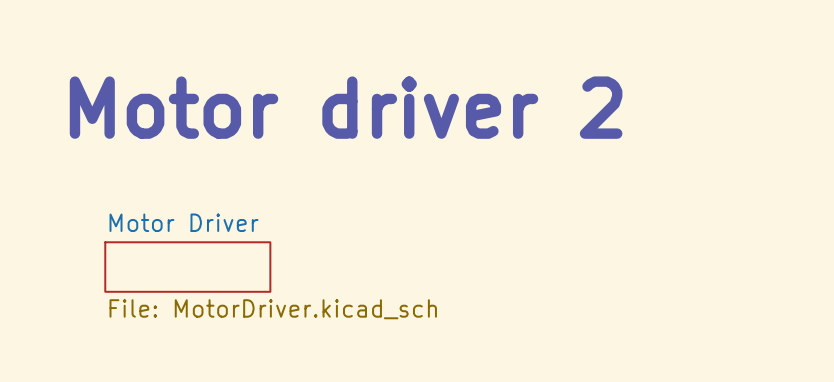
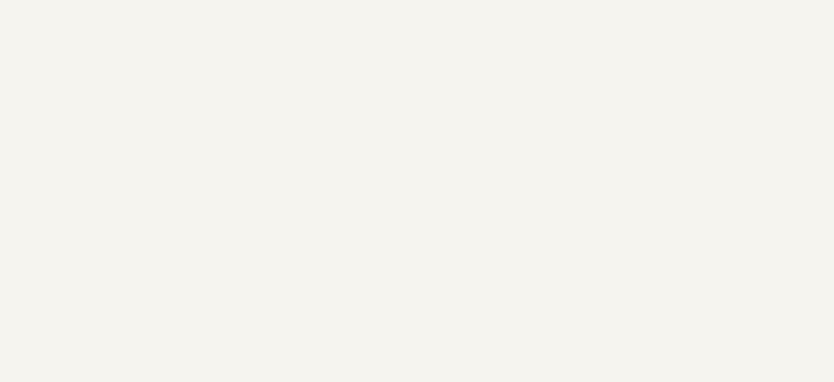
text: Motor driver 2 (346, 107) -> none
sheet Motor Driver: File: MotorDriver.kicad_sch (187, 267) -> none

